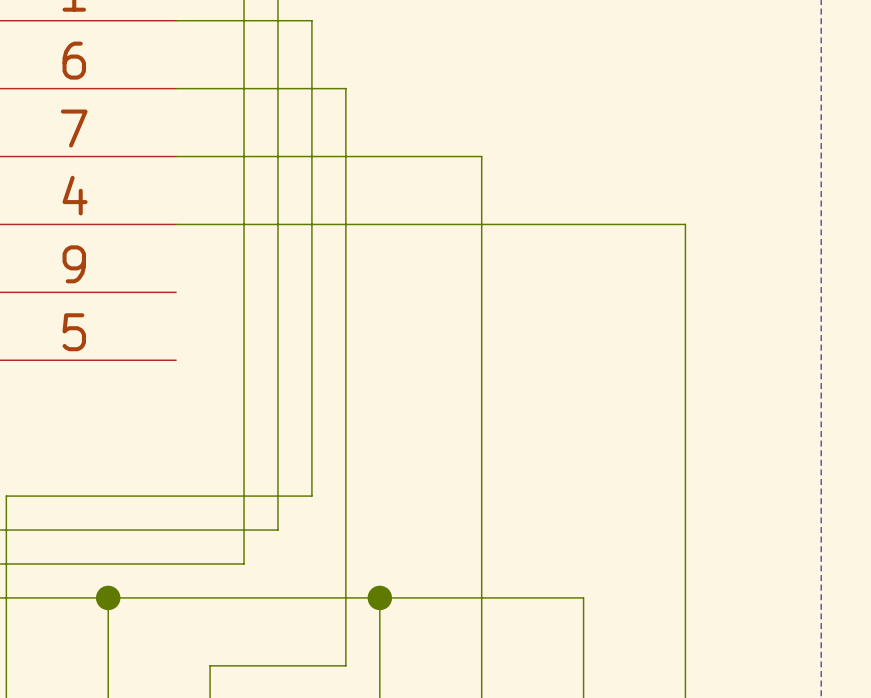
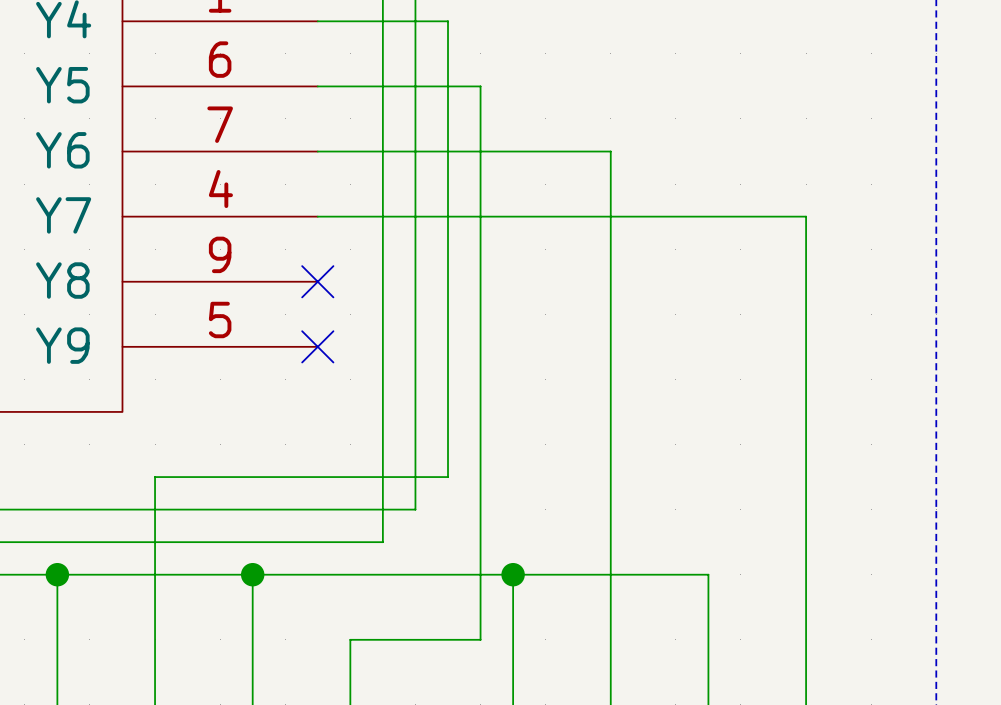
no-connect mark: none -> (317, 281)
no-connect mark: none -> (317, 346)

